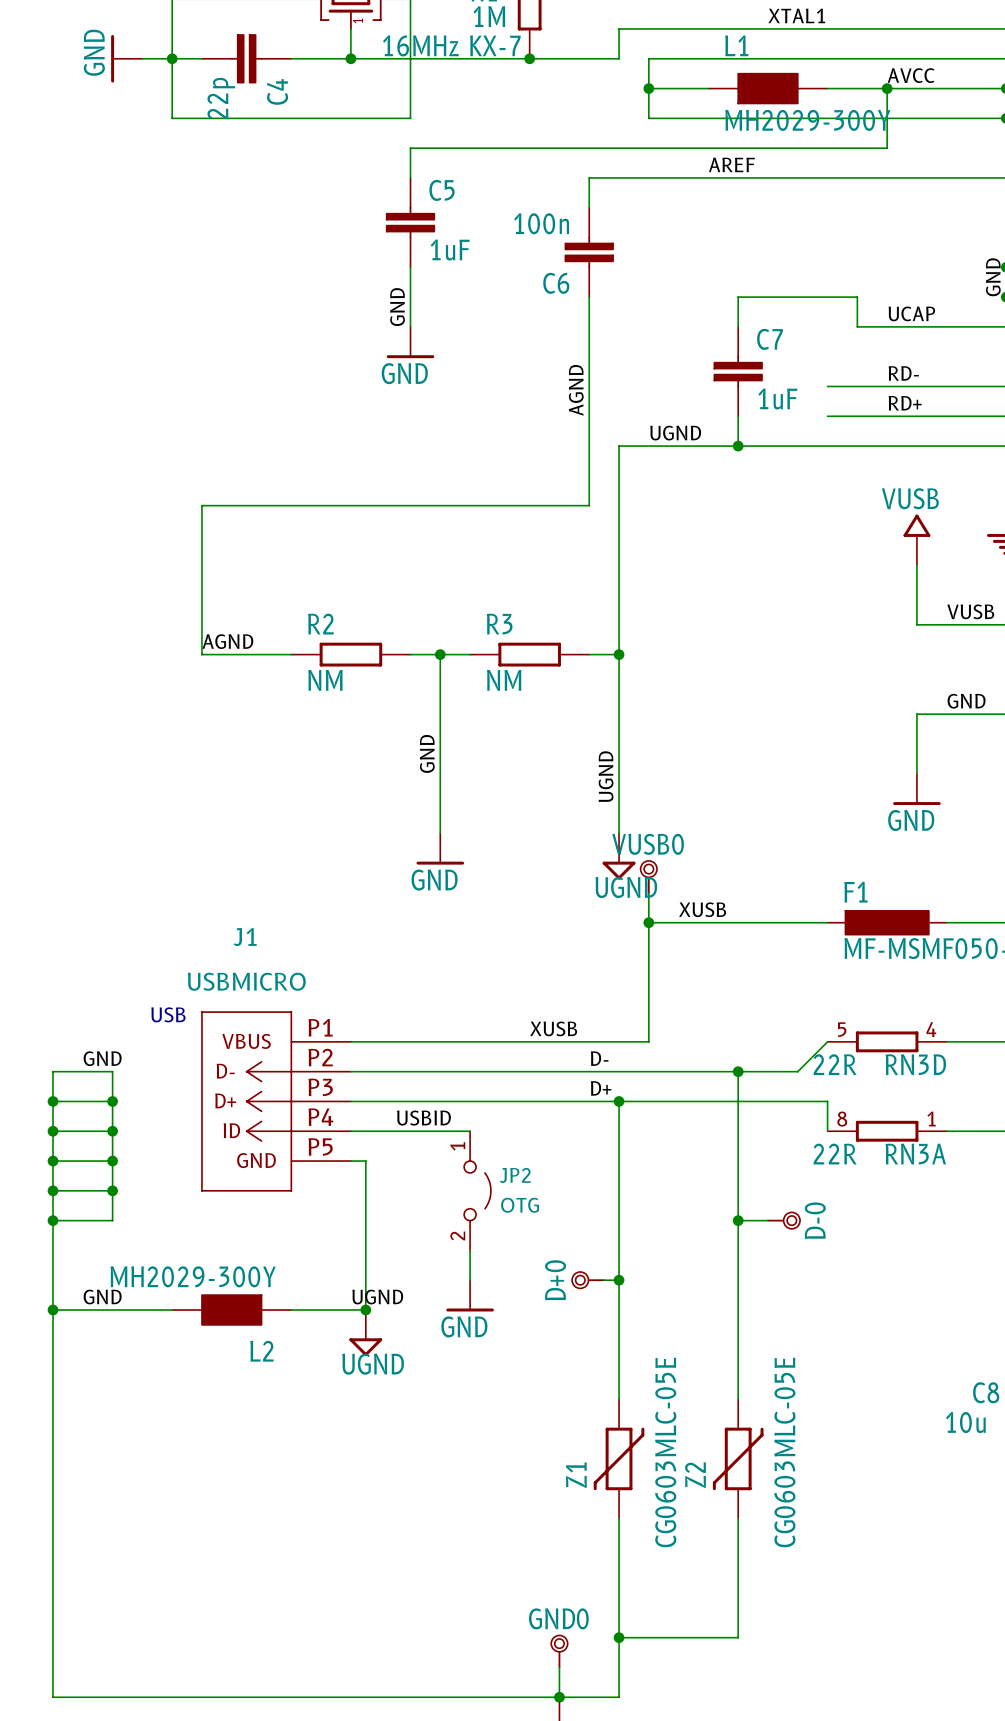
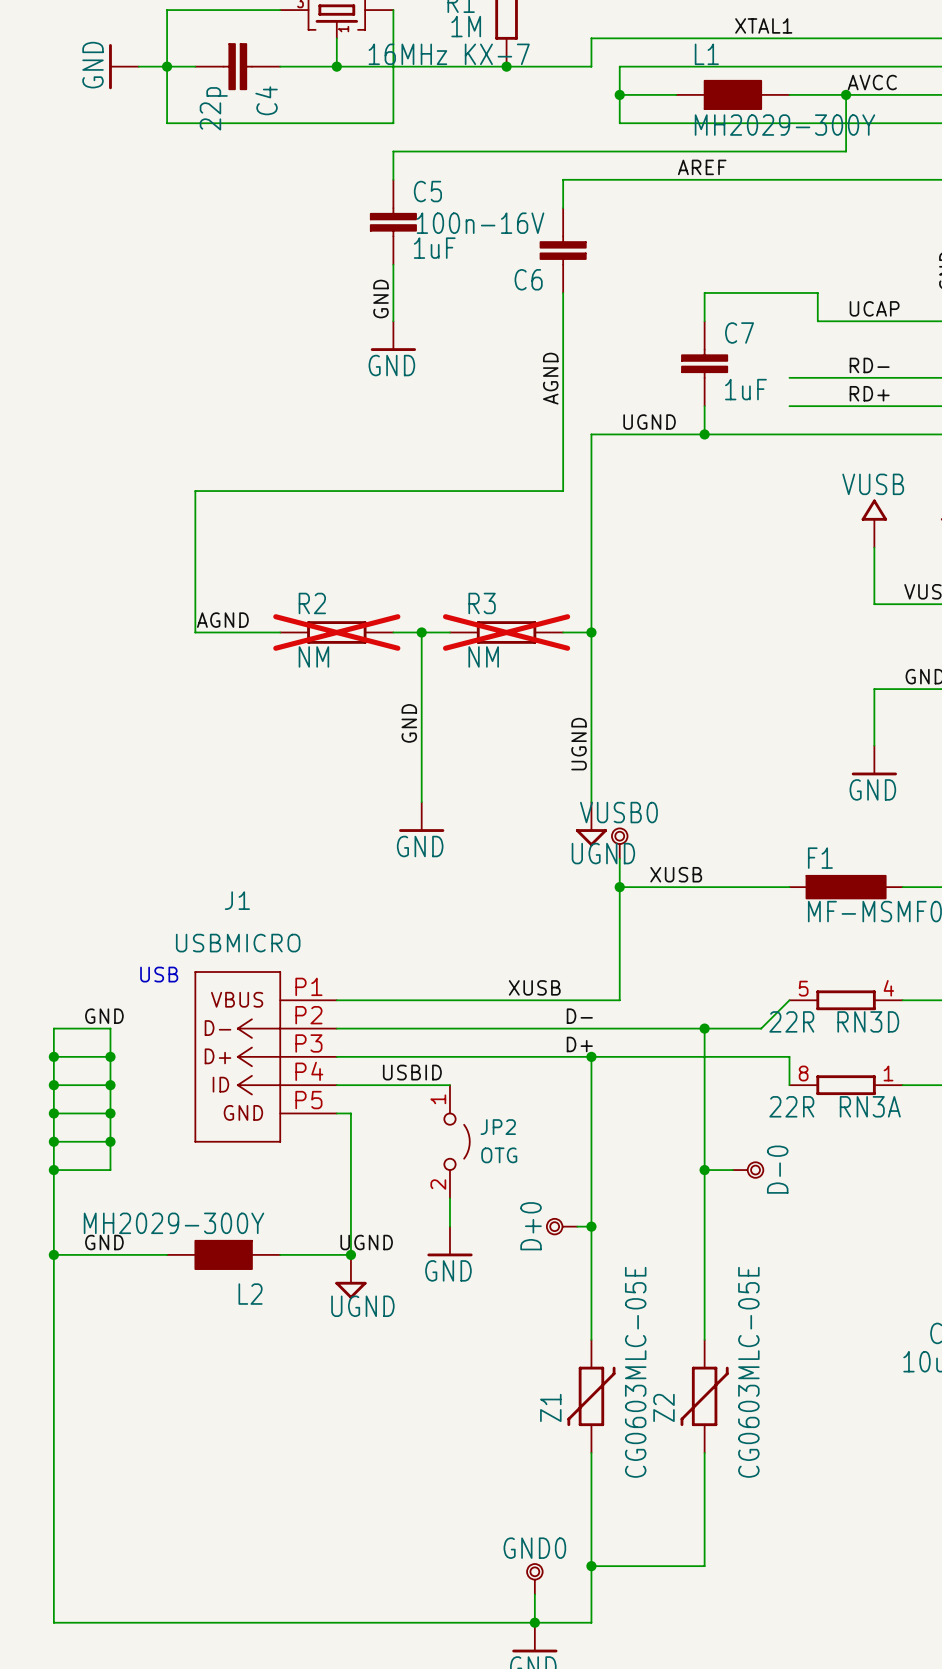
C6 value: 100n (541, 223) -> 100n-16V (480, 223)
R2 do-not-place cross: none -> (336, 632)
R3 do-not-place cross: none -> (506, 632)

